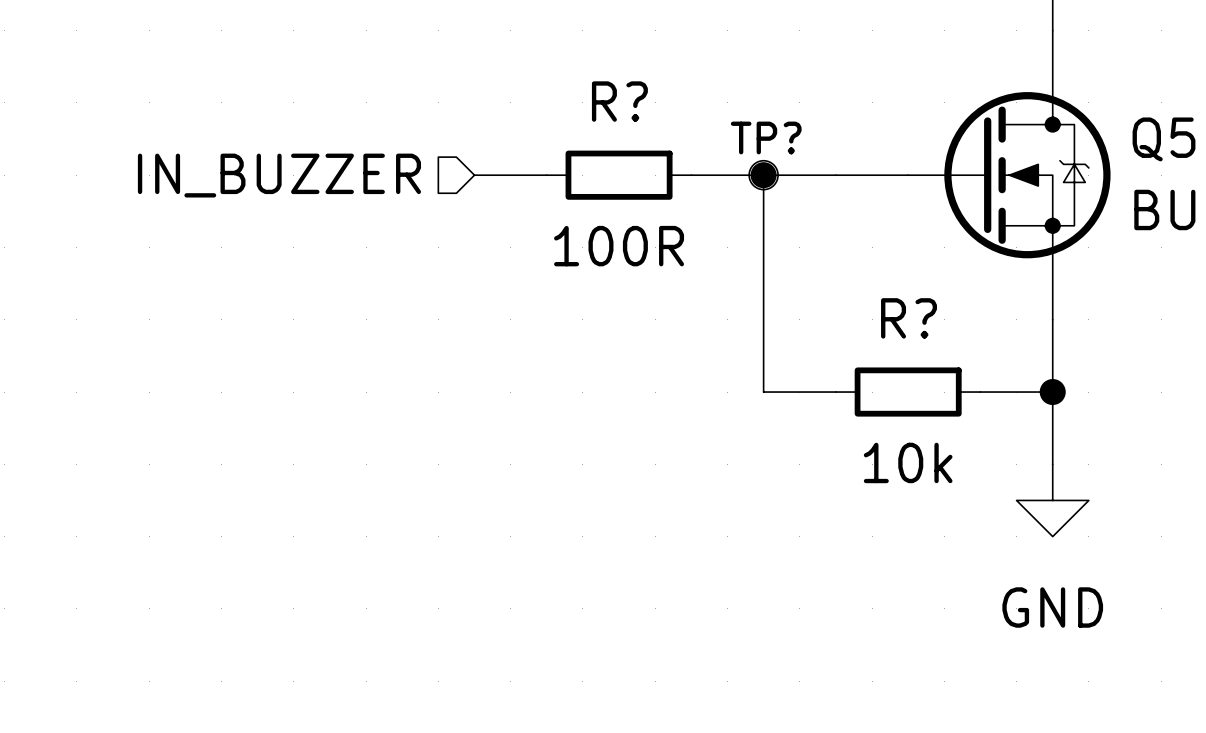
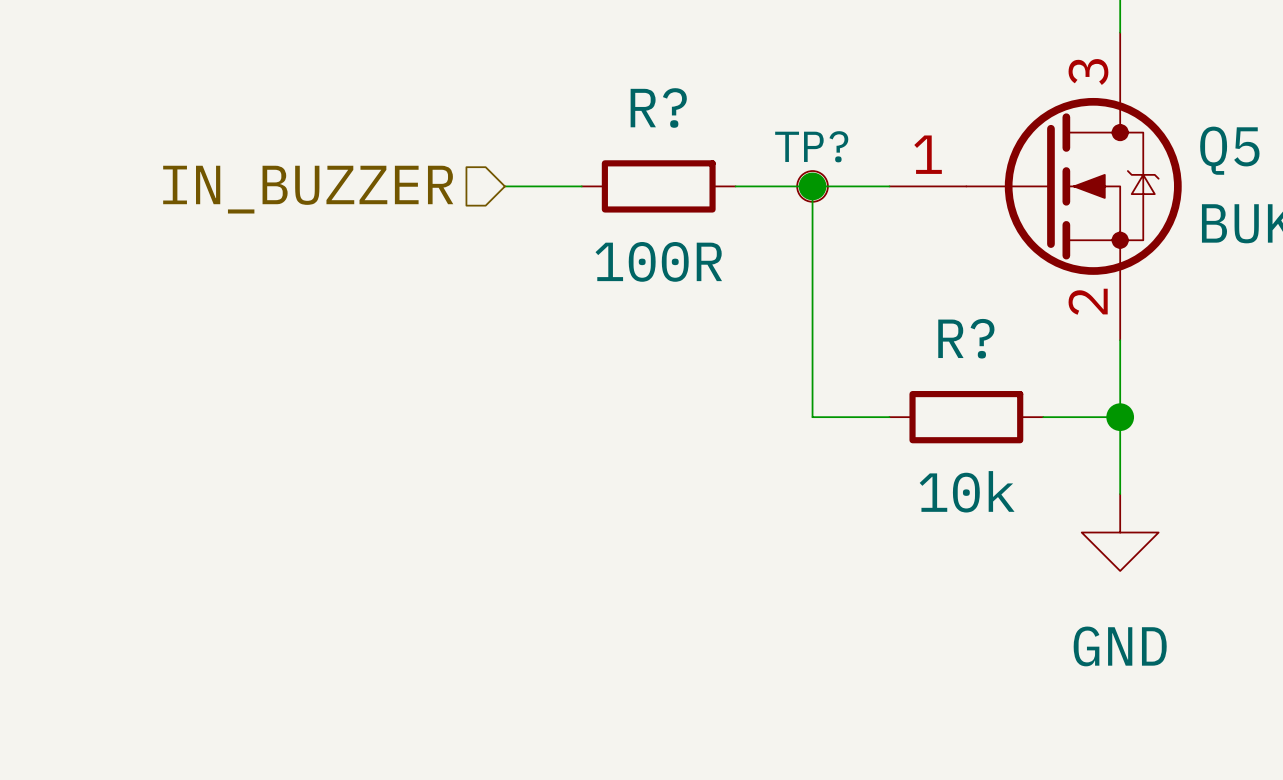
Q5 pin number: none -> 3 (1088, 71)
Q5 pin number: none -> 1 (928, 154)
Q5 pin number: none -> 2 (1088, 301)

